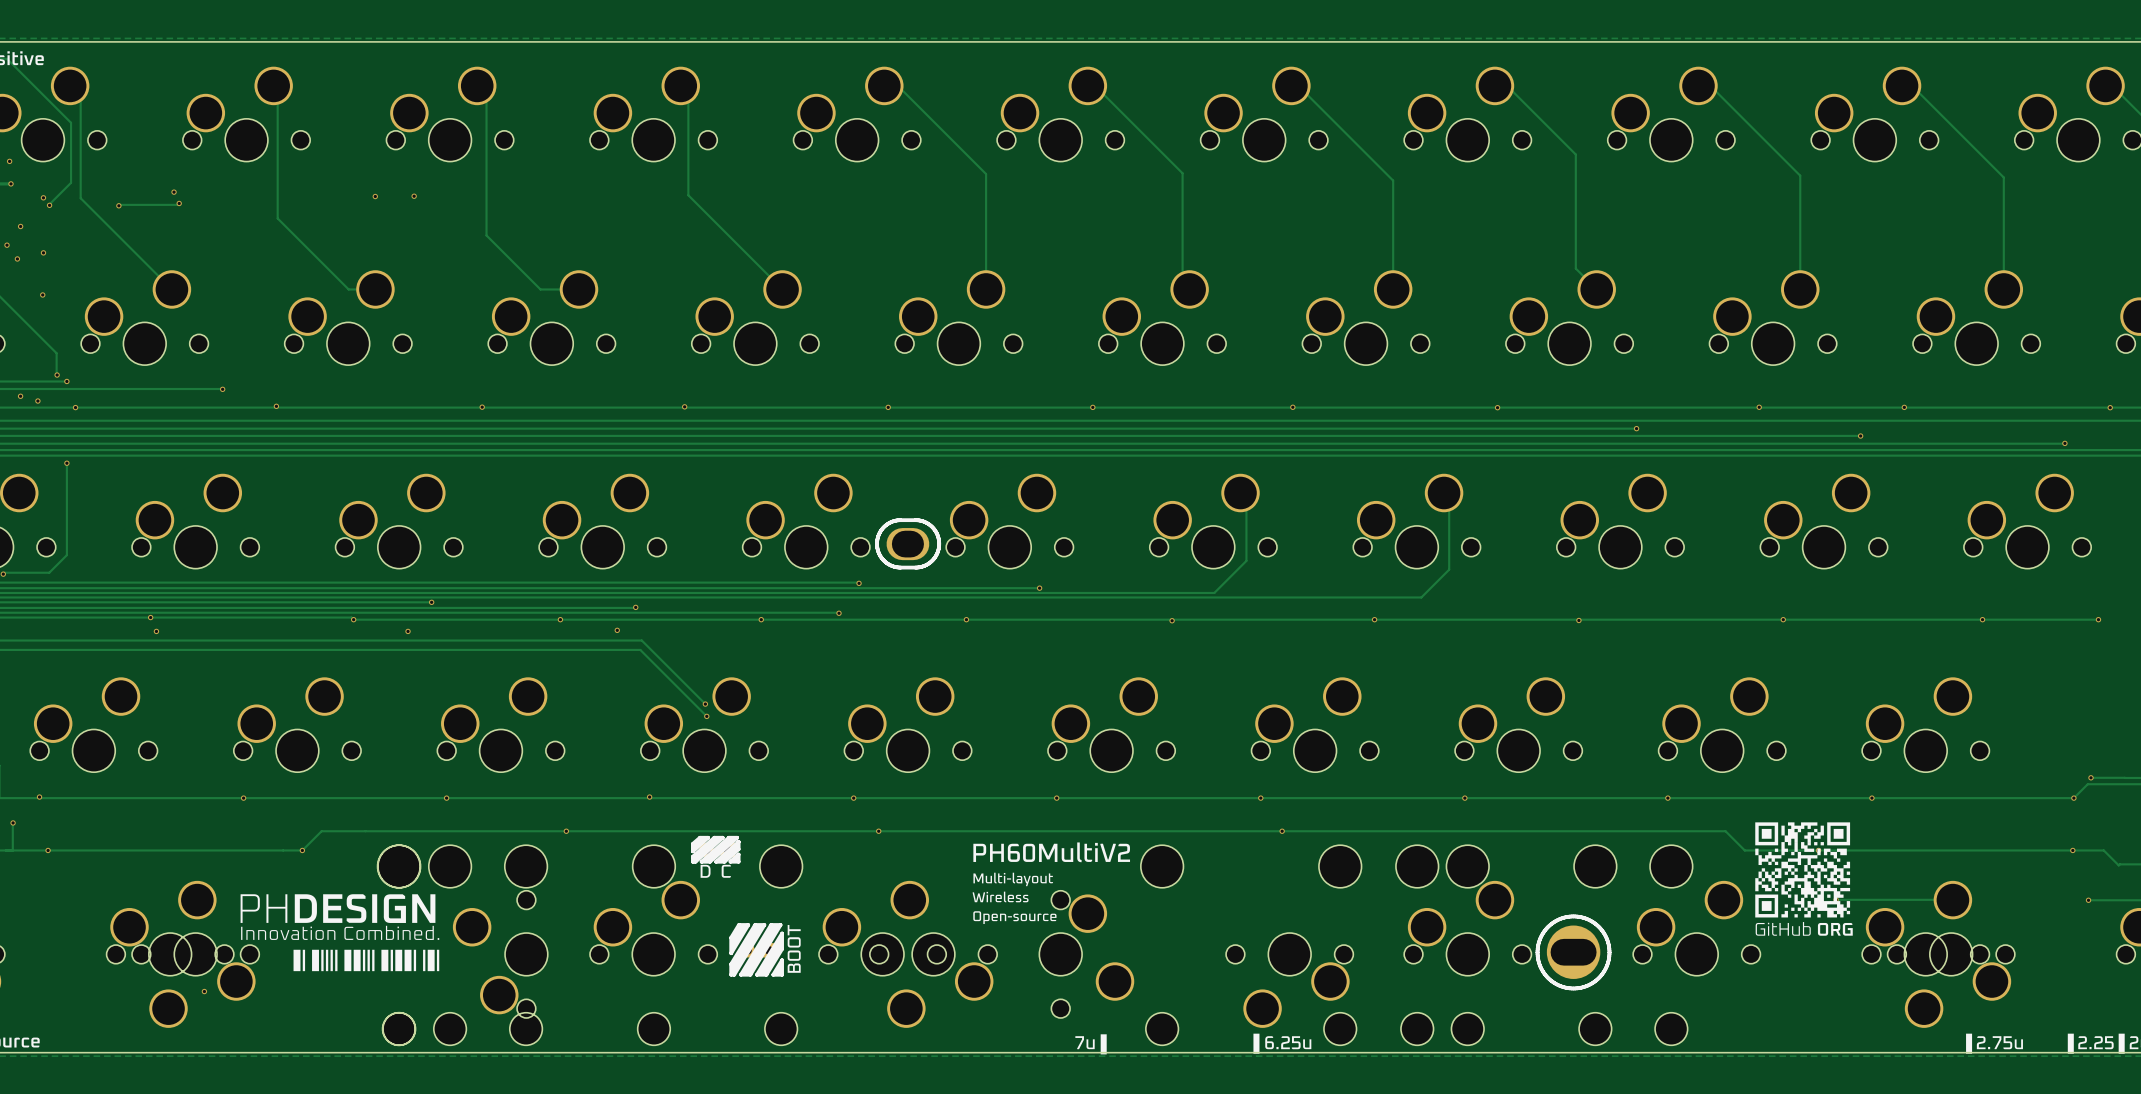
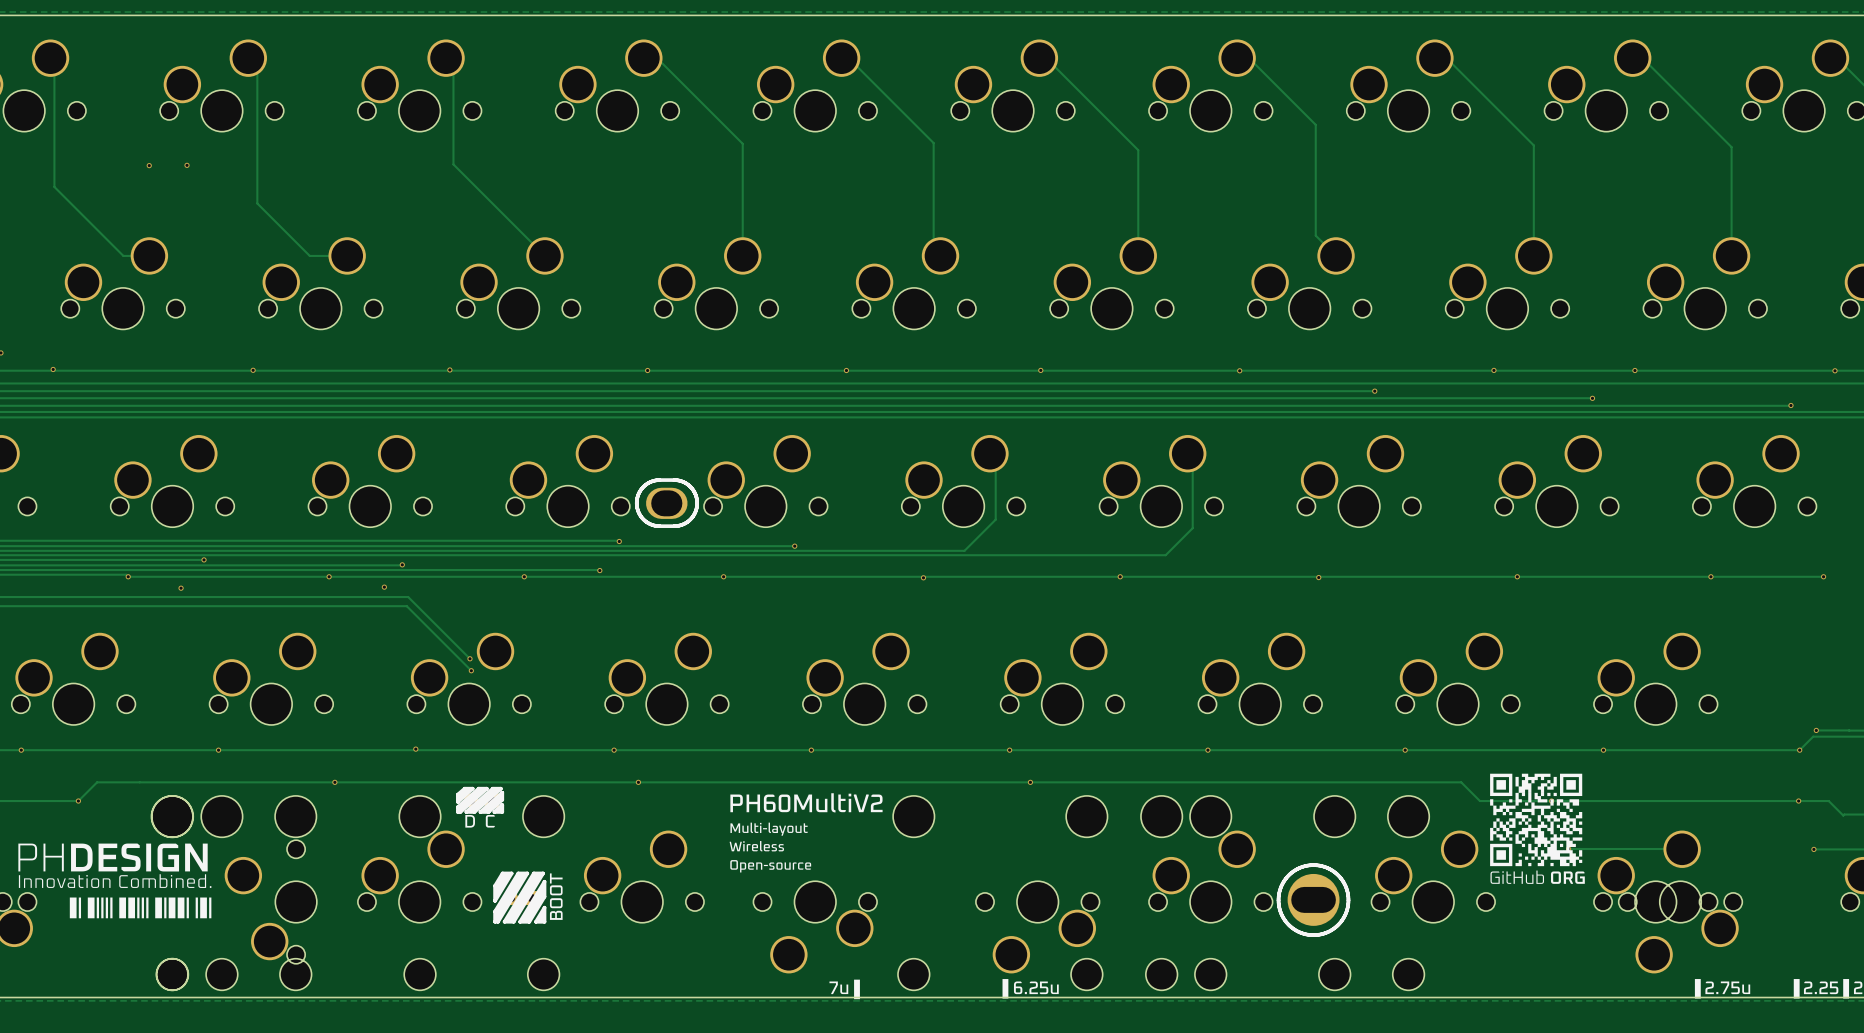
part rotation: 0° (1086, 954) -> 90° clockwise (815, 927)
part: (933, 980) -> none

